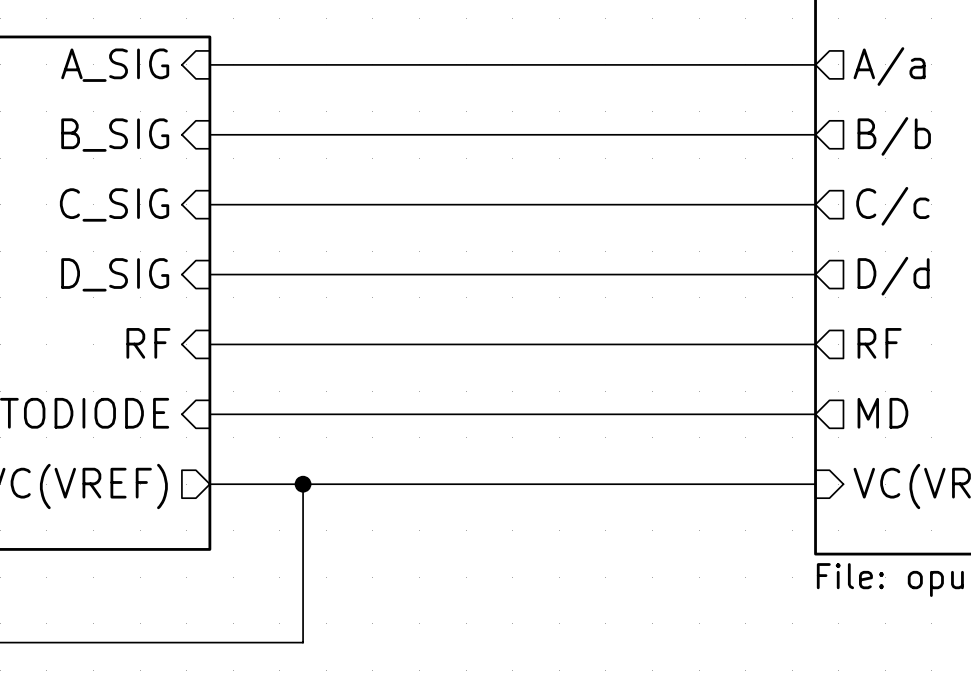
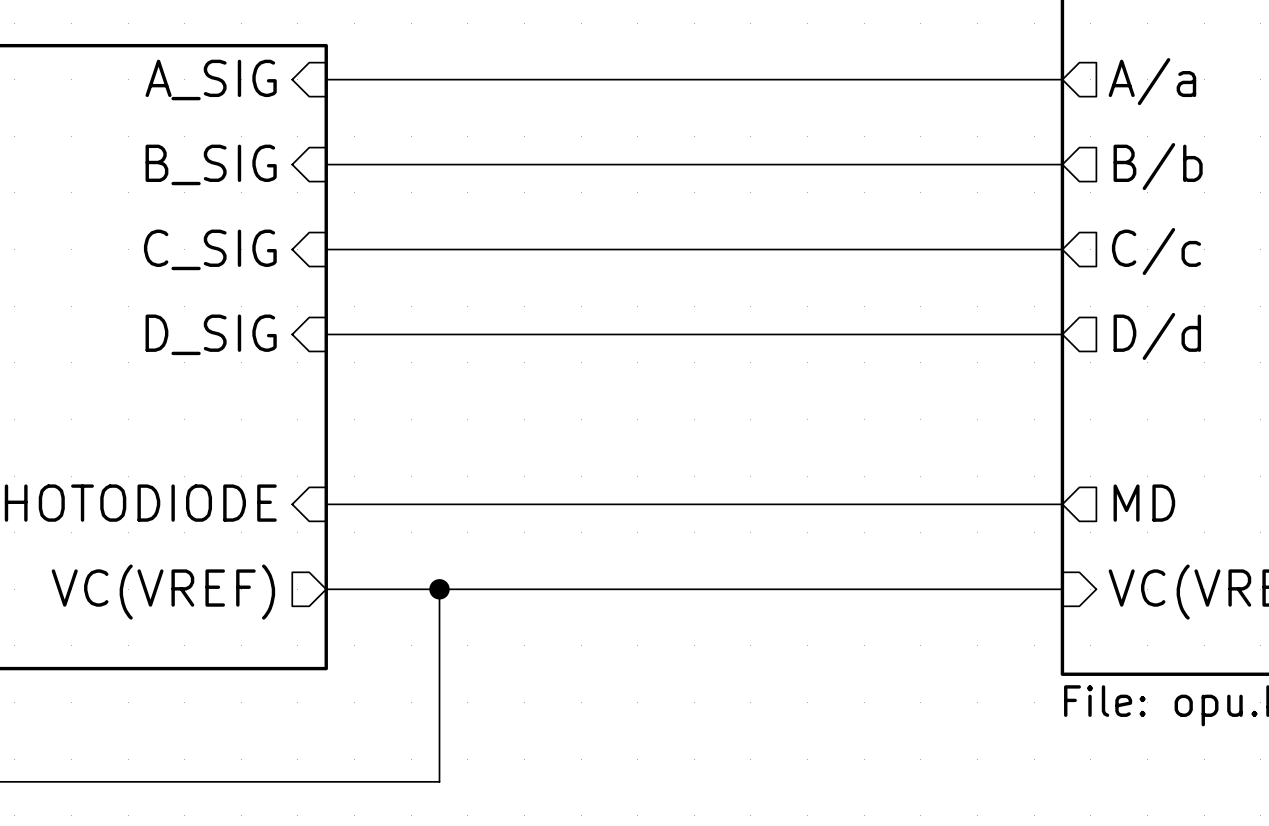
sheet pin: RF (148, 343) -> none
sheet pin: RF (879, 343) -> none
wire: (209, 344) (815, 344) -> none

